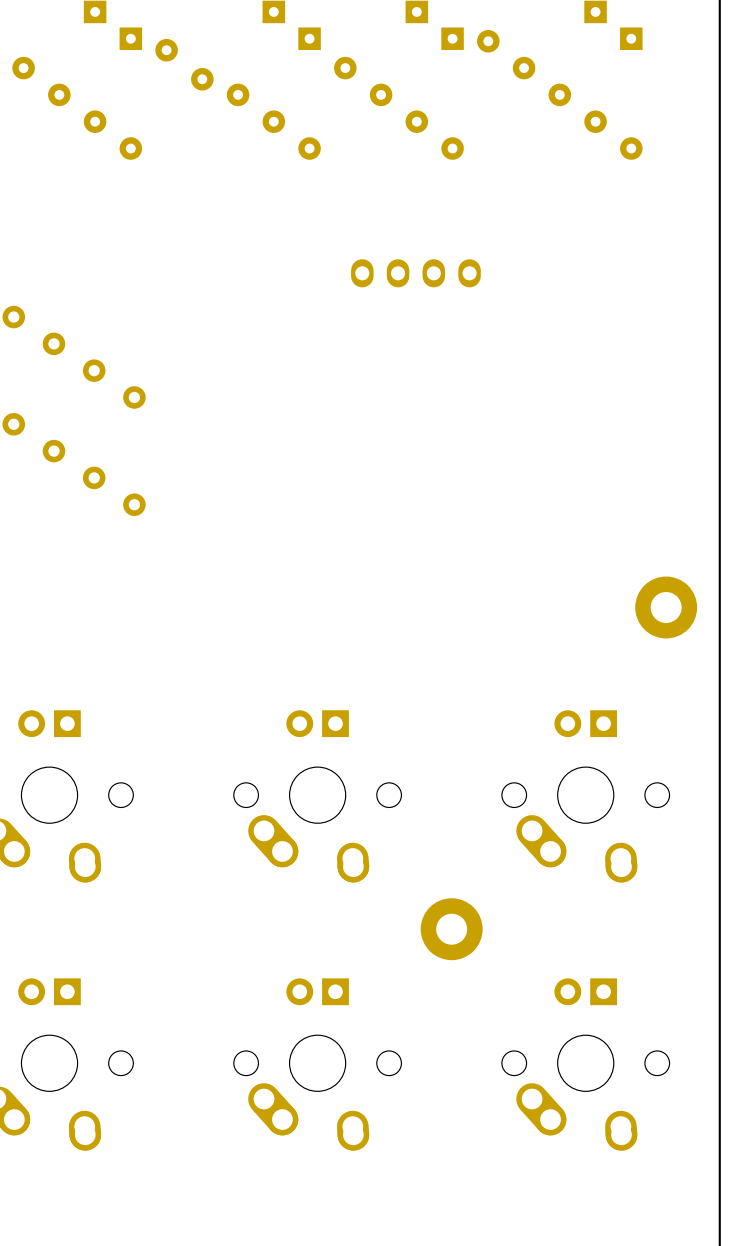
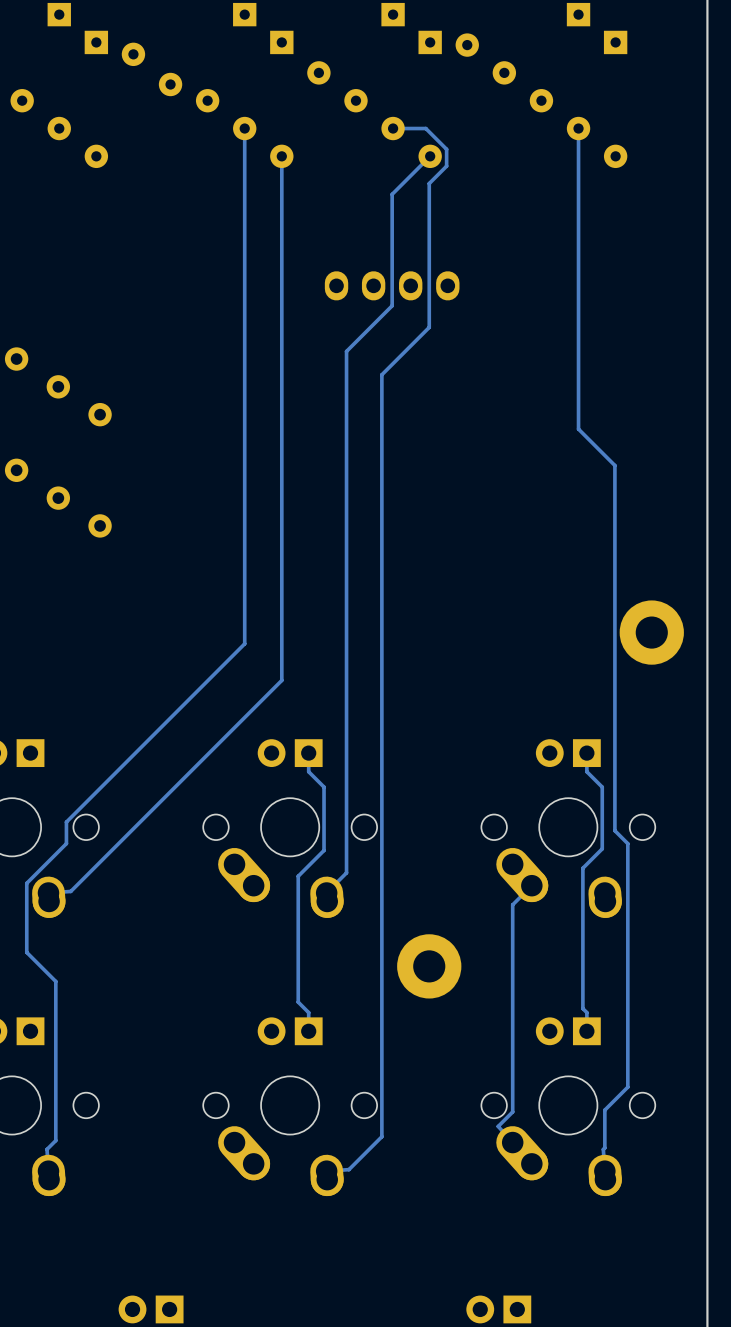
track: none -> (244, 128) (244, 643) (66, 822) (66, 843) (26, 883) (26, 952) (55, 981) (55, 1140) (46, 1149) (49, 1179)
track: none -> (393, 128) (425, 128) (446, 149) (446, 166) (429, 183) (429, 327) (381, 374) (381, 1136) (348, 1169) (326, 1171)
track: none -> (578, 128) (578, 429) (614, 465) (614, 830) (627, 843) (627, 1087) (604, 1110) (604, 1171)
track: none -> (281, 156) (281, 680) (70, 891) (48, 892) (49, 901)
track: none -> (430, 156) (392, 194) (392, 305) (346, 351) (346, 872) (326, 892) (327, 901)
track: none -> (308, 753) (308, 771) (324, 787) (324, 850) (298, 876) (298, 1002) (308, 1012) (308, 1031)
track: none -> (586, 753) (586, 771) (602, 787) (602, 848) (582, 868) (582, 1008) (586, 1012) (586, 1031)
track: none -> (531, 885) (512, 904) (512, 1111) (498, 1126) (531, 1163)

